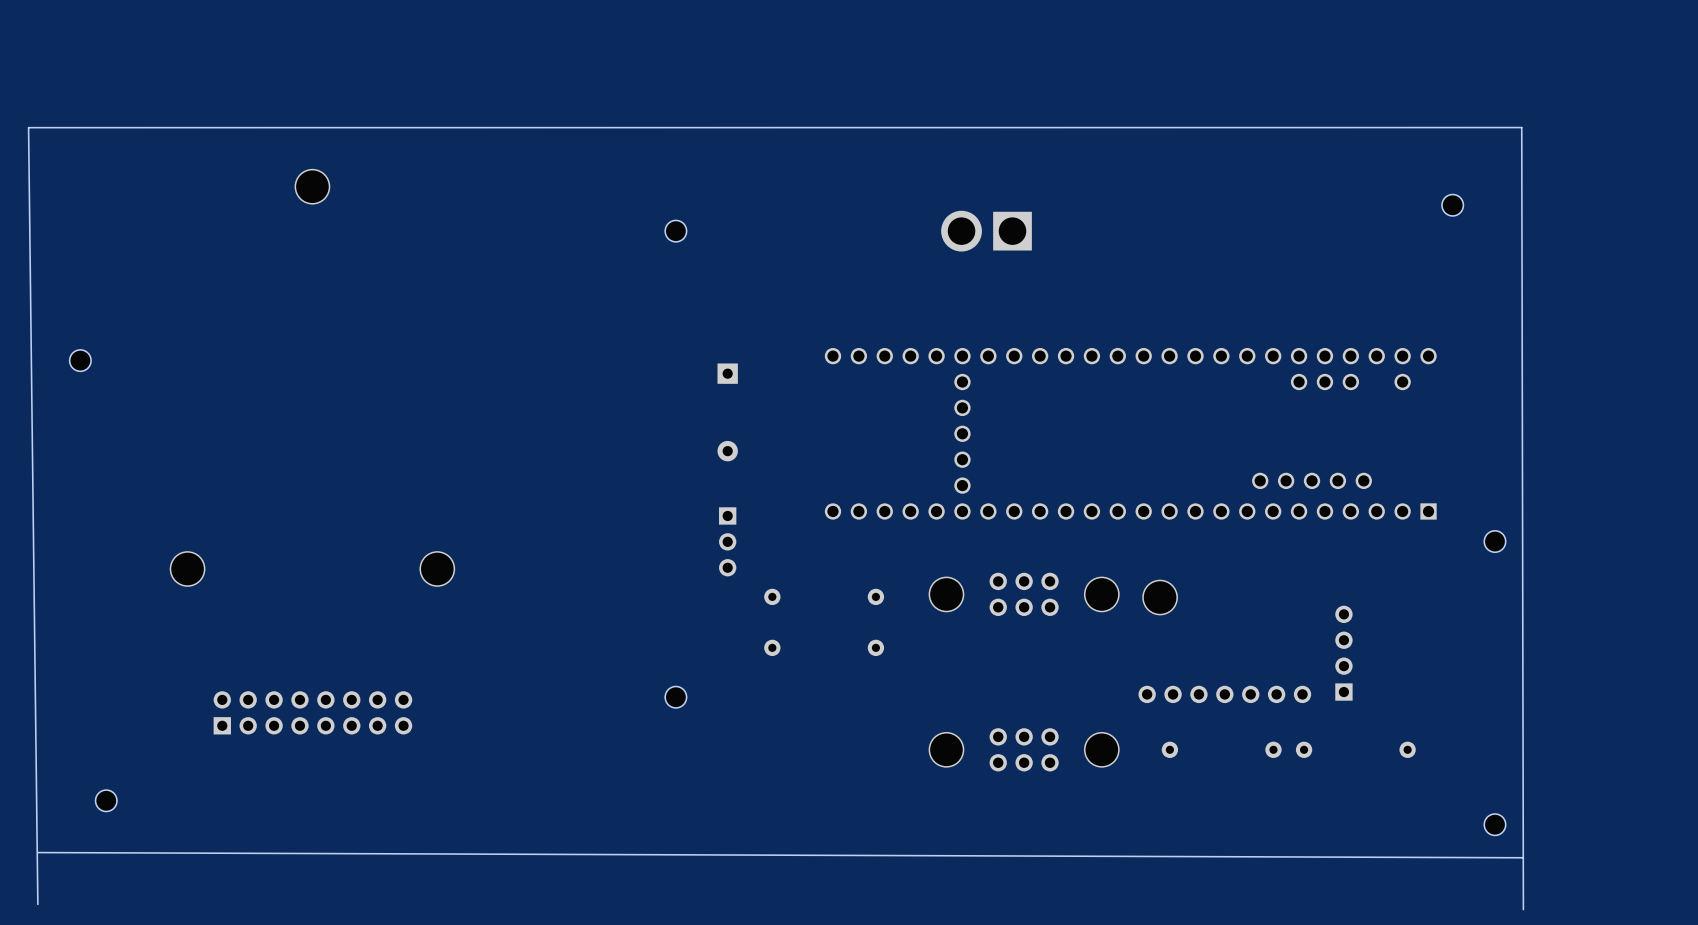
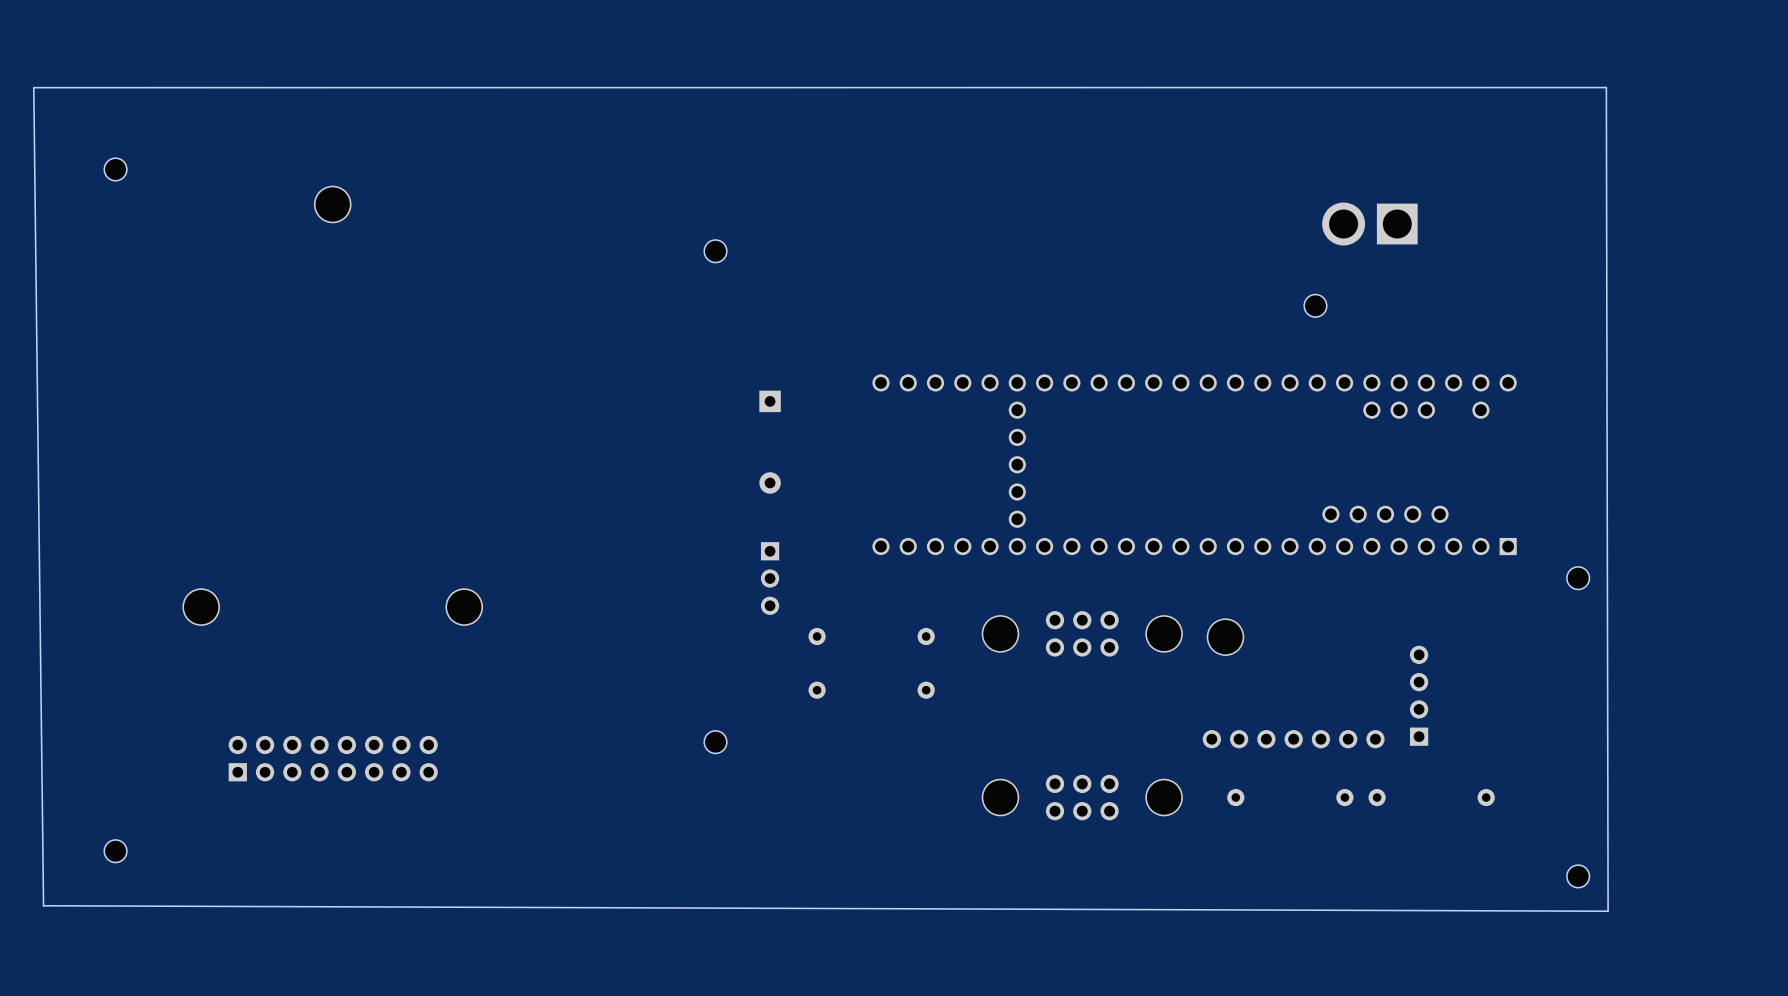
part: none -> (1369, 224)
part position: (1452, 205) -> (1315, 305)
part: (986, 231) -> none
part position: (80, 360) -> (115, 169)
board edge: (37, 904) (28, 127) (1521, 127) (1523, 909) -> (43, 905) (33, 87) (1606, 87) (1608, 911)

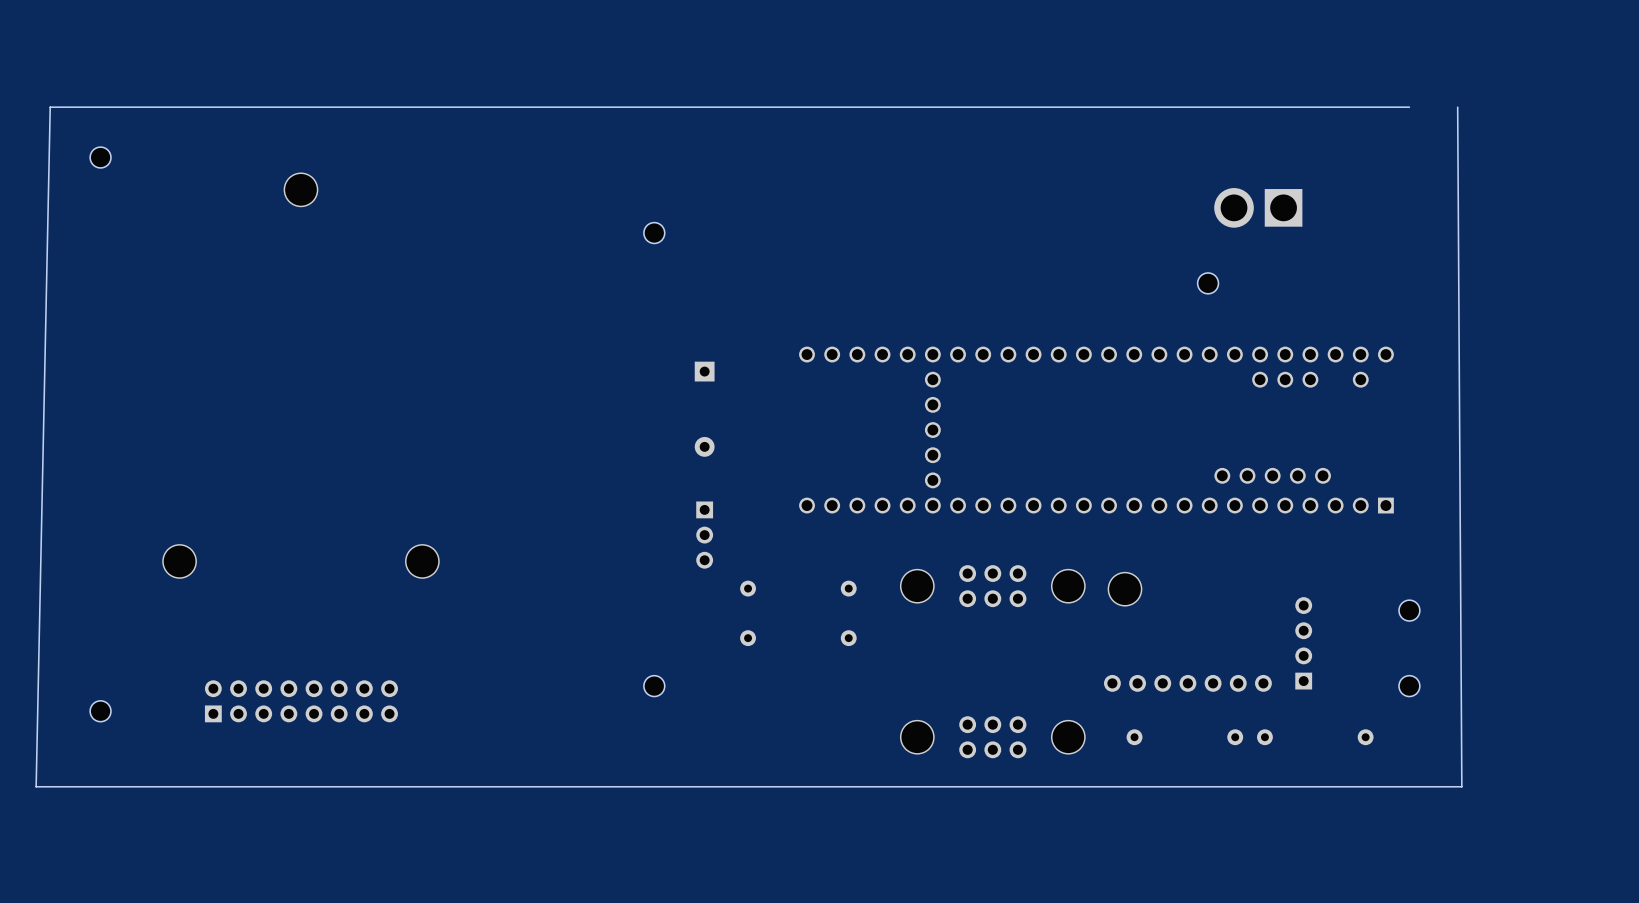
board edge: (1606, 87) (1608, 911) (43, 905) (33, 87) (1606, 87) -> none
board edge: none -> (1457, 107) (1461, 786) (36, 786) (50, 107) (1409, 107)
part: (1578, 578) -> none
part: none -> (1409, 610)
part: none -> (1409, 686)
part position: (115, 851) -> (100, 711)
part: (1578, 876) -> none

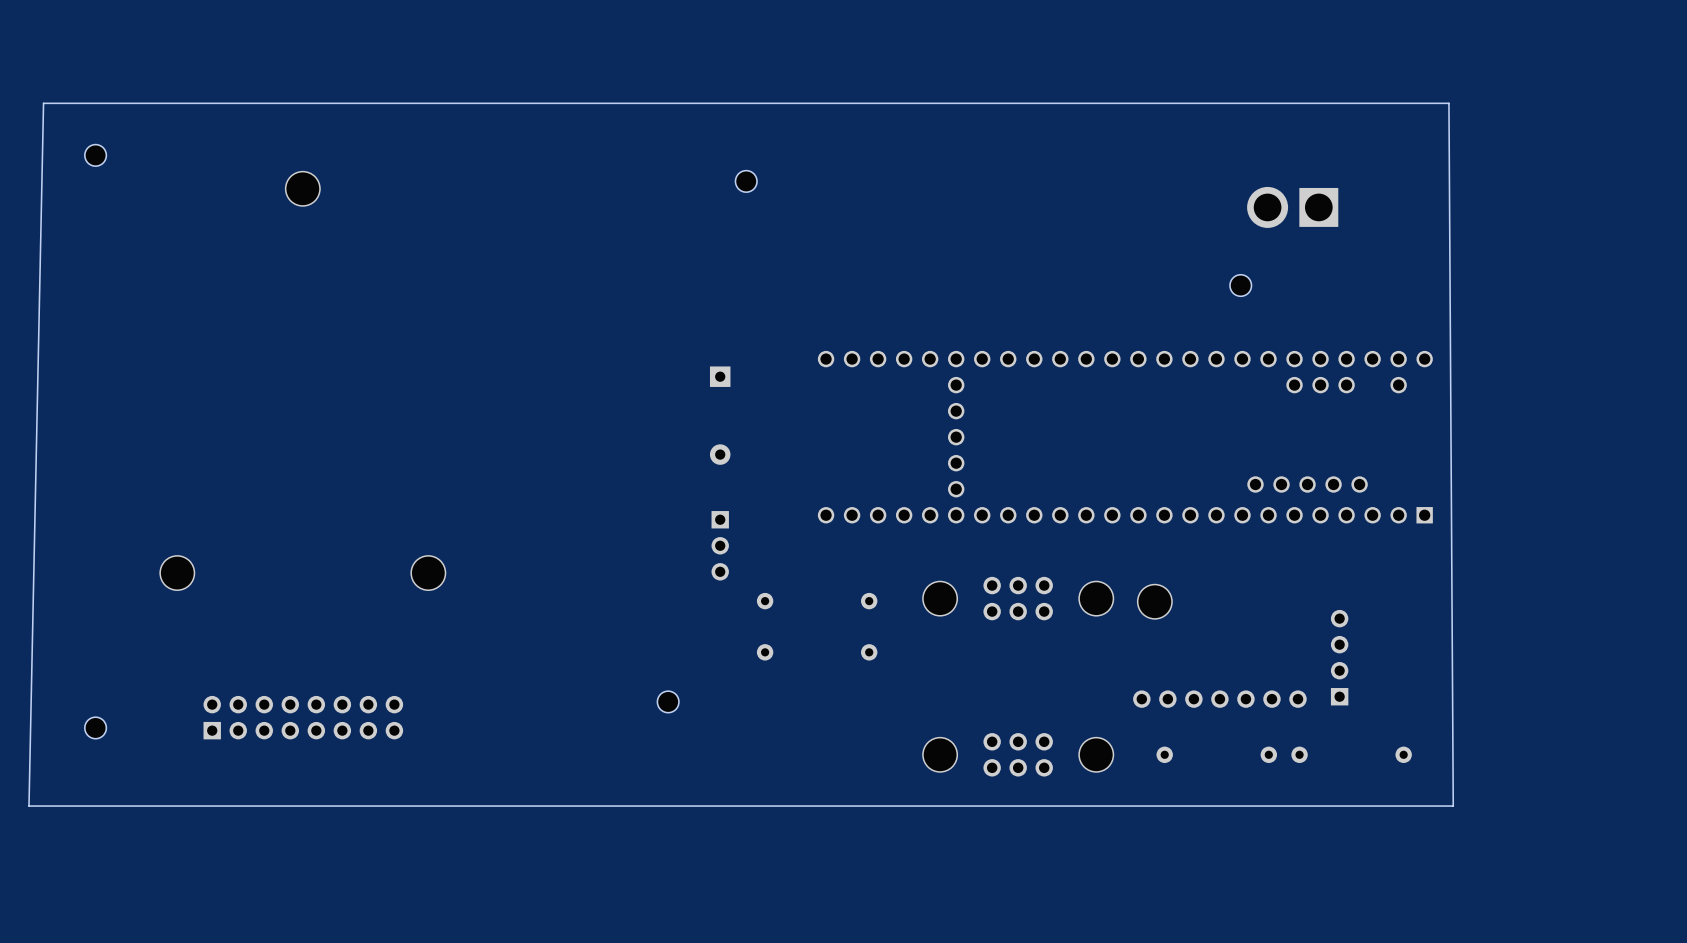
board edge: (1457, 107) (1461, 786) (1413, 786) -> (1448, 103) (1453, 806)
part position: (654, 233) -> (746, 181)
part: (1409, 610) -> none
part: (1409, 686) -> none

